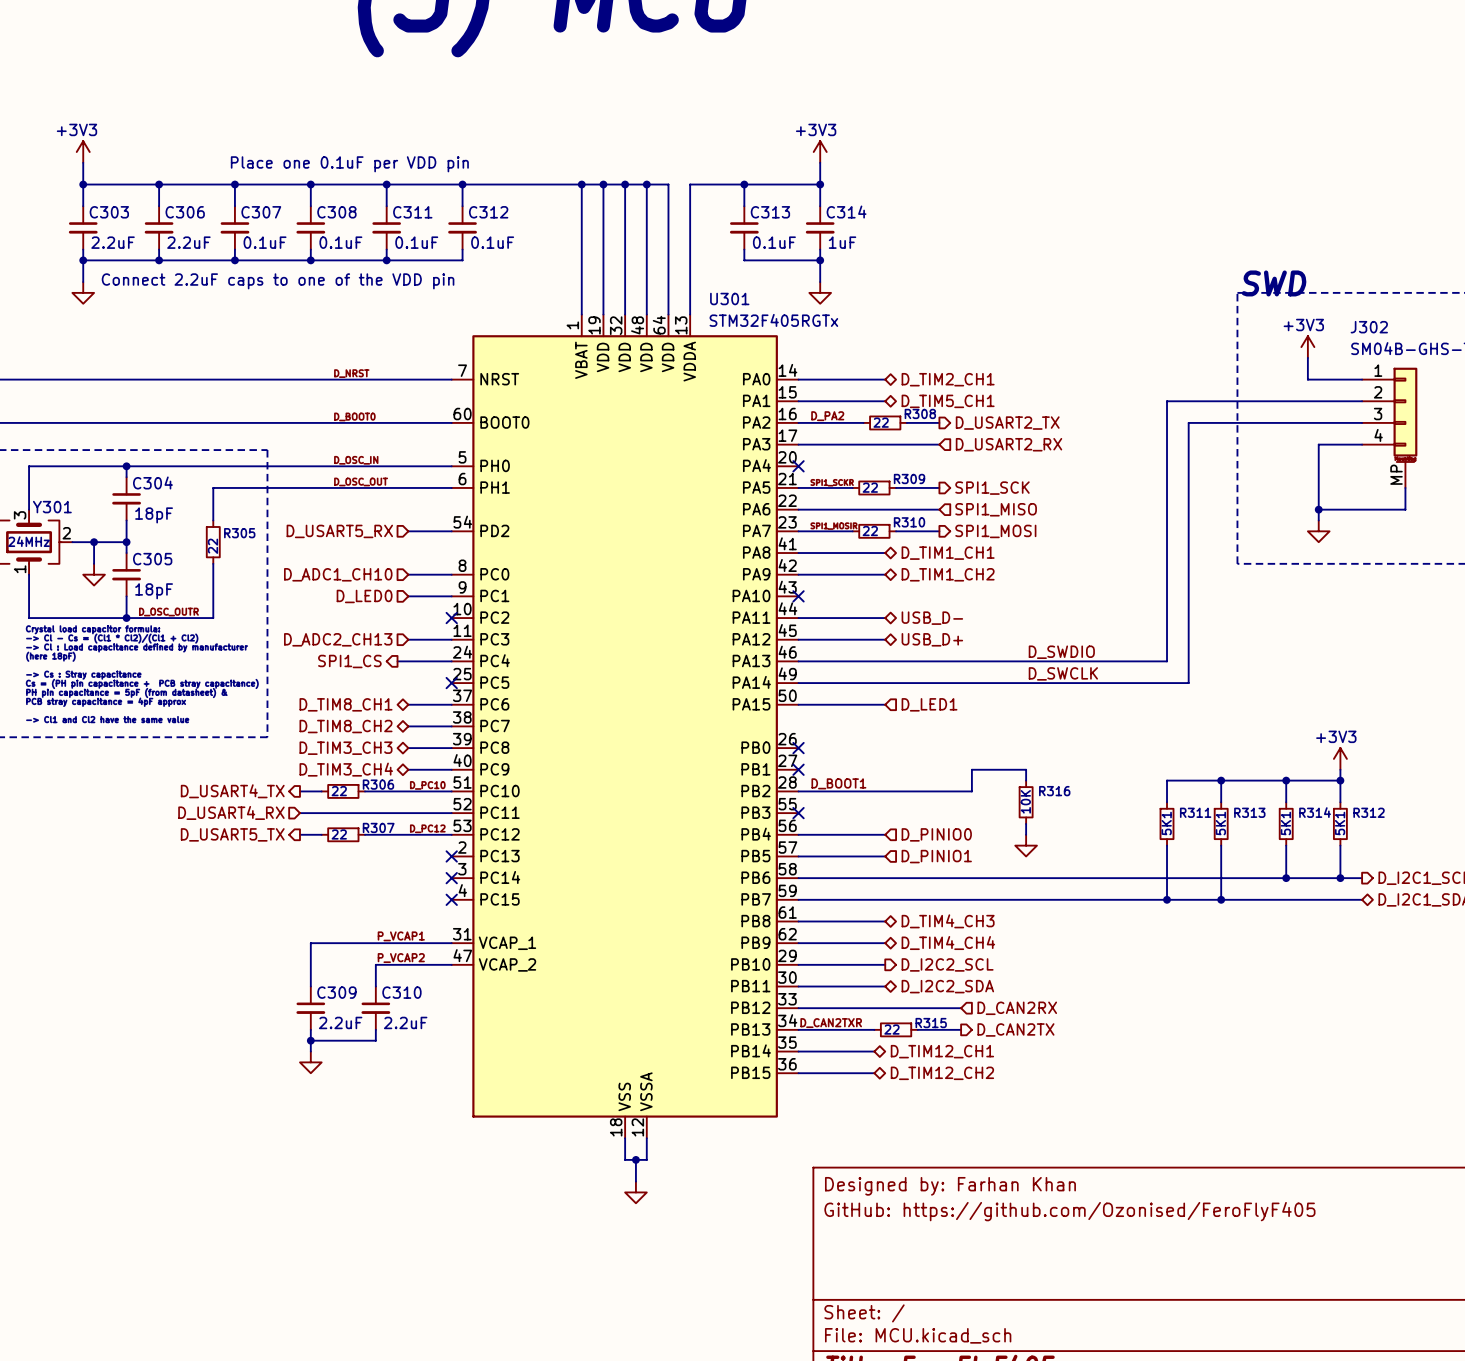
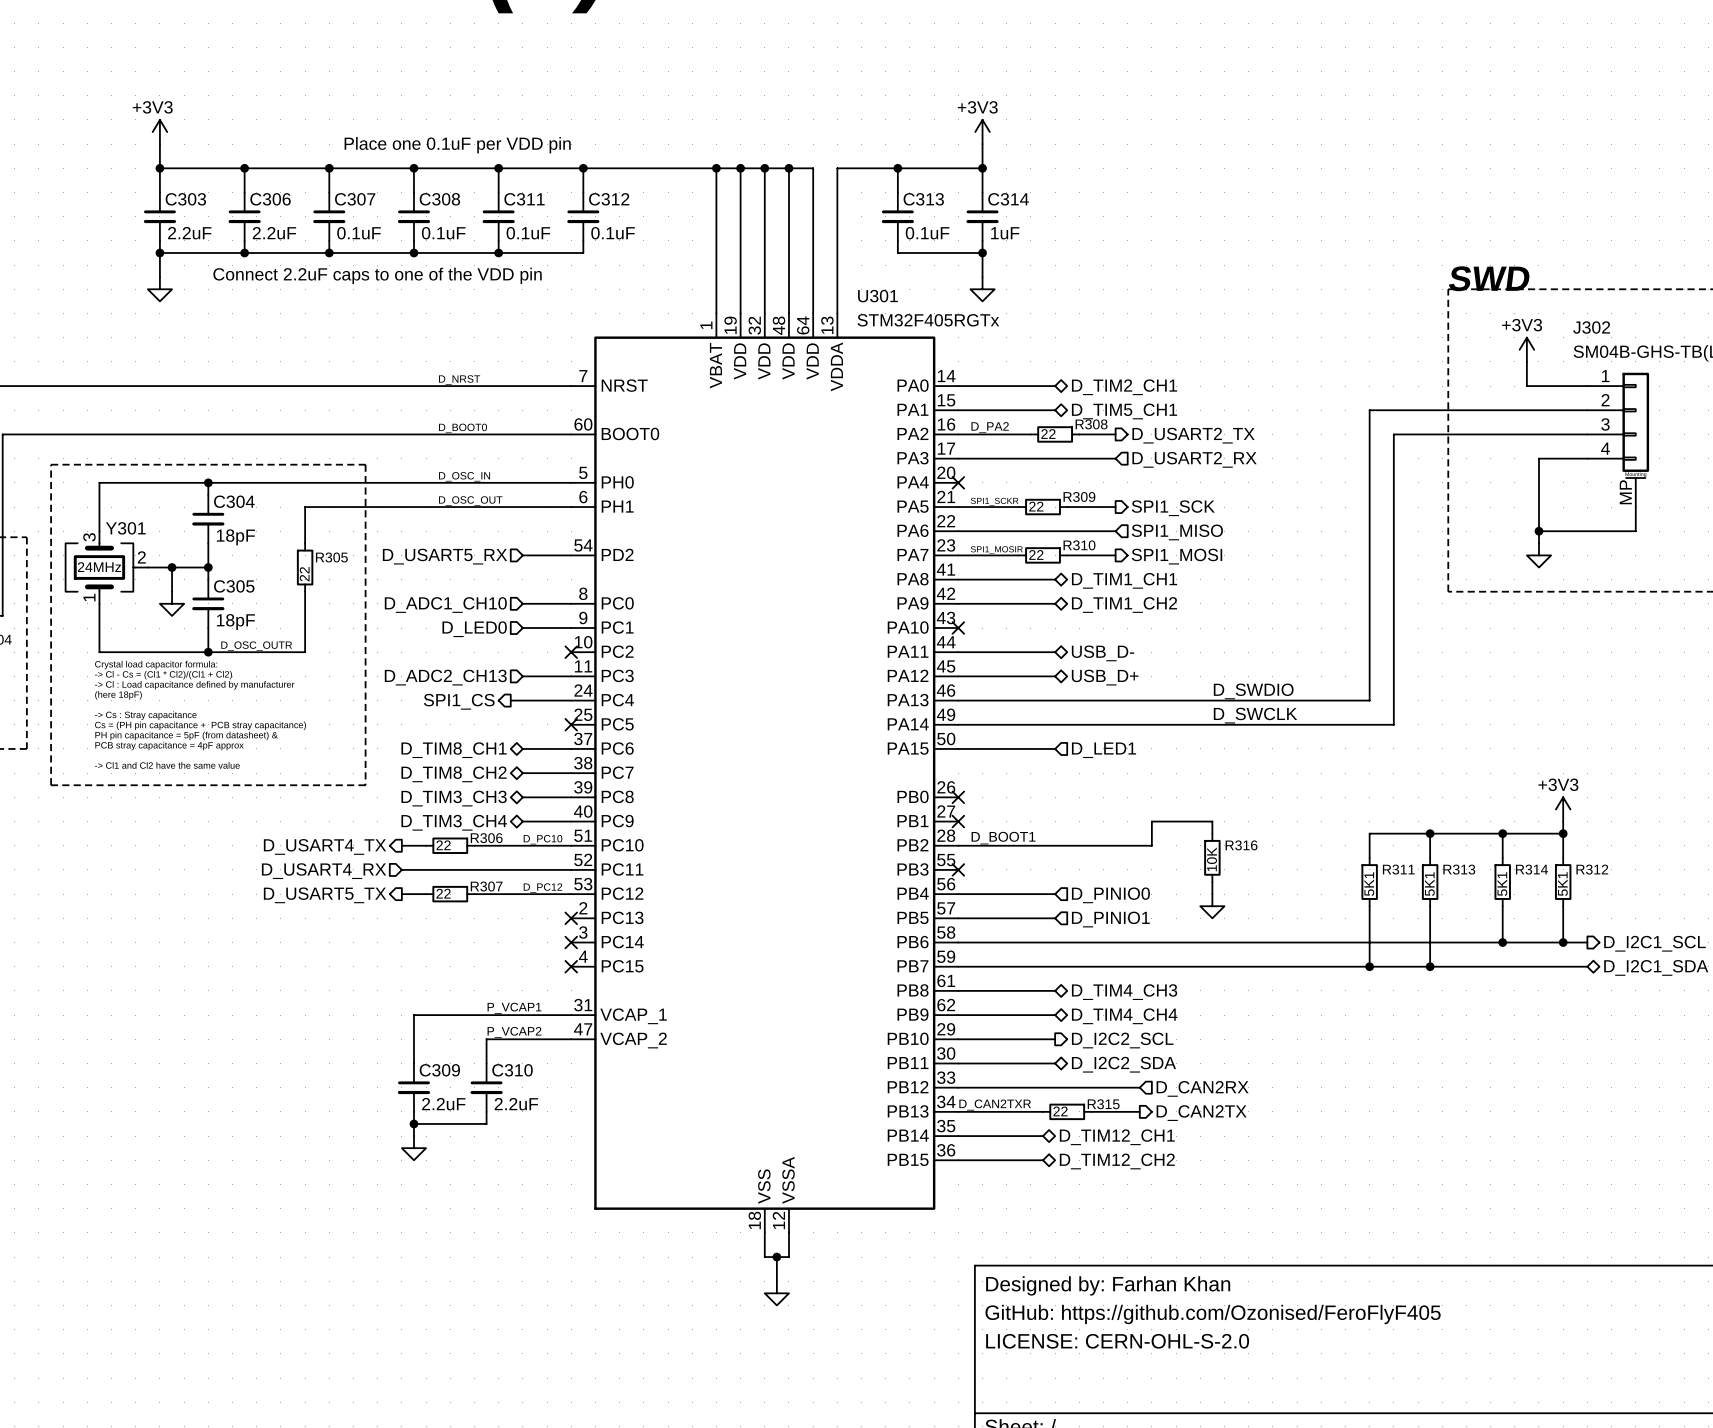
title block: none -> LICENSE: CERN-OHL-S-2.0 (1117, 1341)

